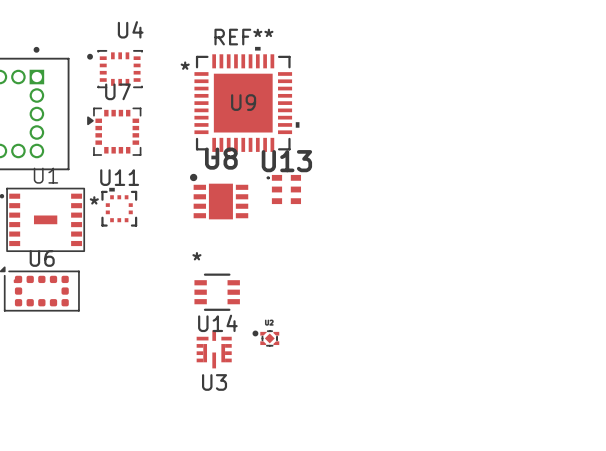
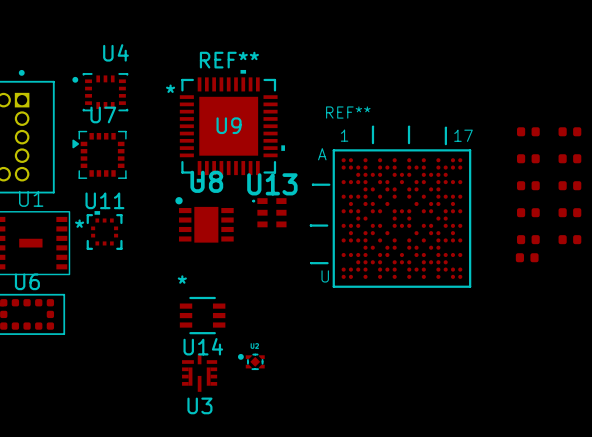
part: none -> (528, 131)
part: none -> (569, 131)
part: none -> (528, 158)
part: none -> (569, 158)
part: none -> (528, 185)
part: none -> (569, 185)
part: none -> (390, 206)
part: none -> (528, 212)
part: none -> (569, 212)
part: none -> (528, 239)
part: none -> (569, 239)
part: none -> (527, 257)

